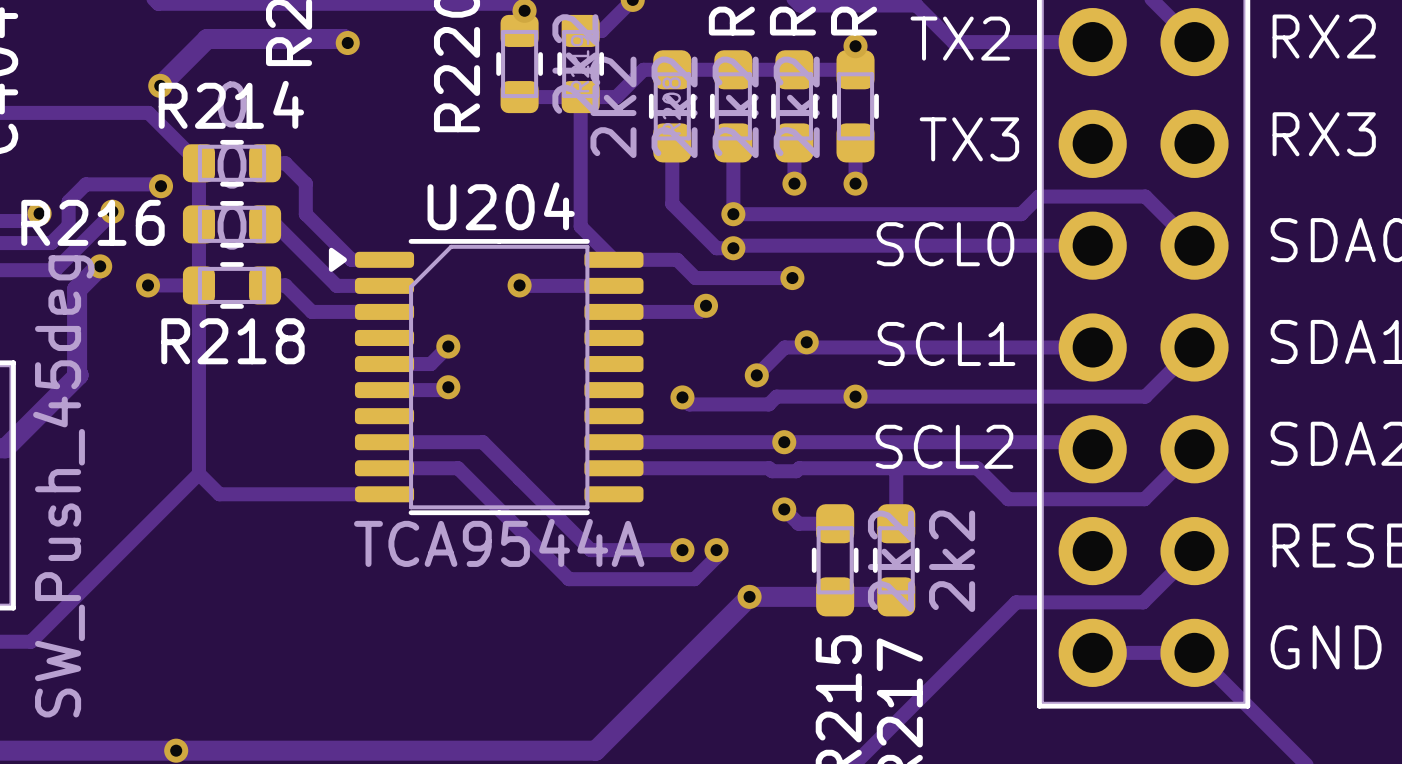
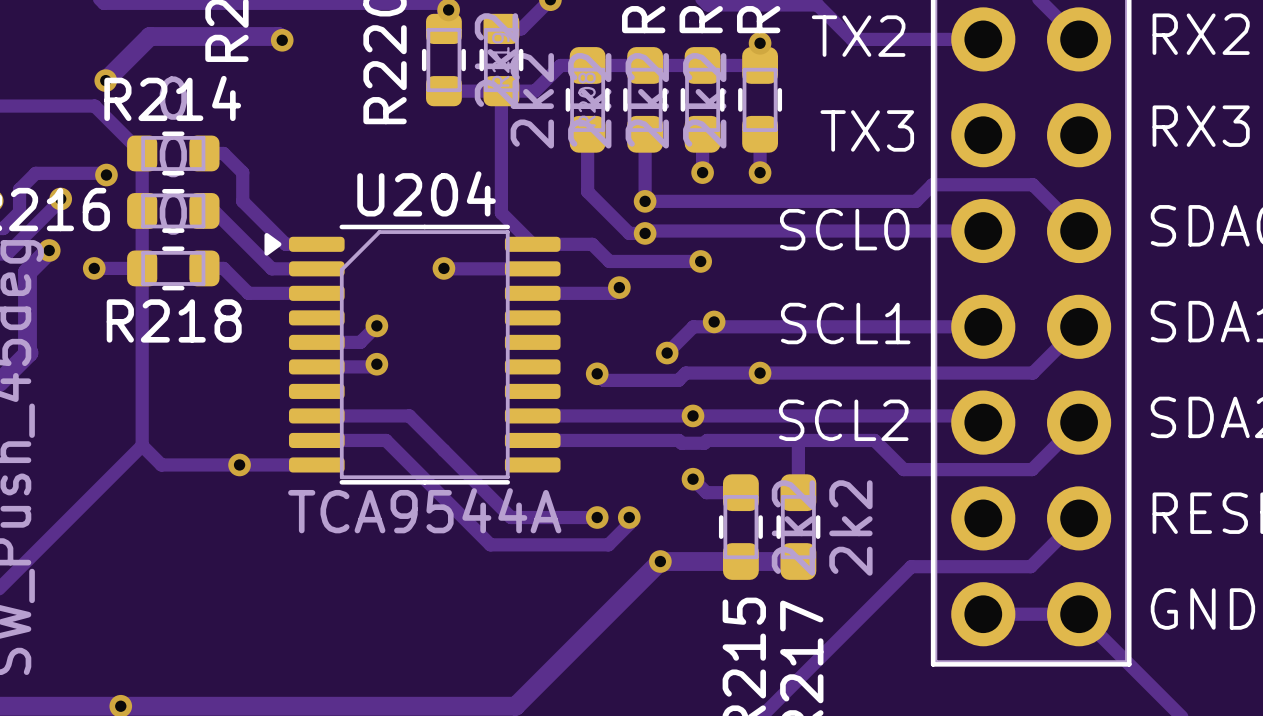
via: none -> (239, 464)

